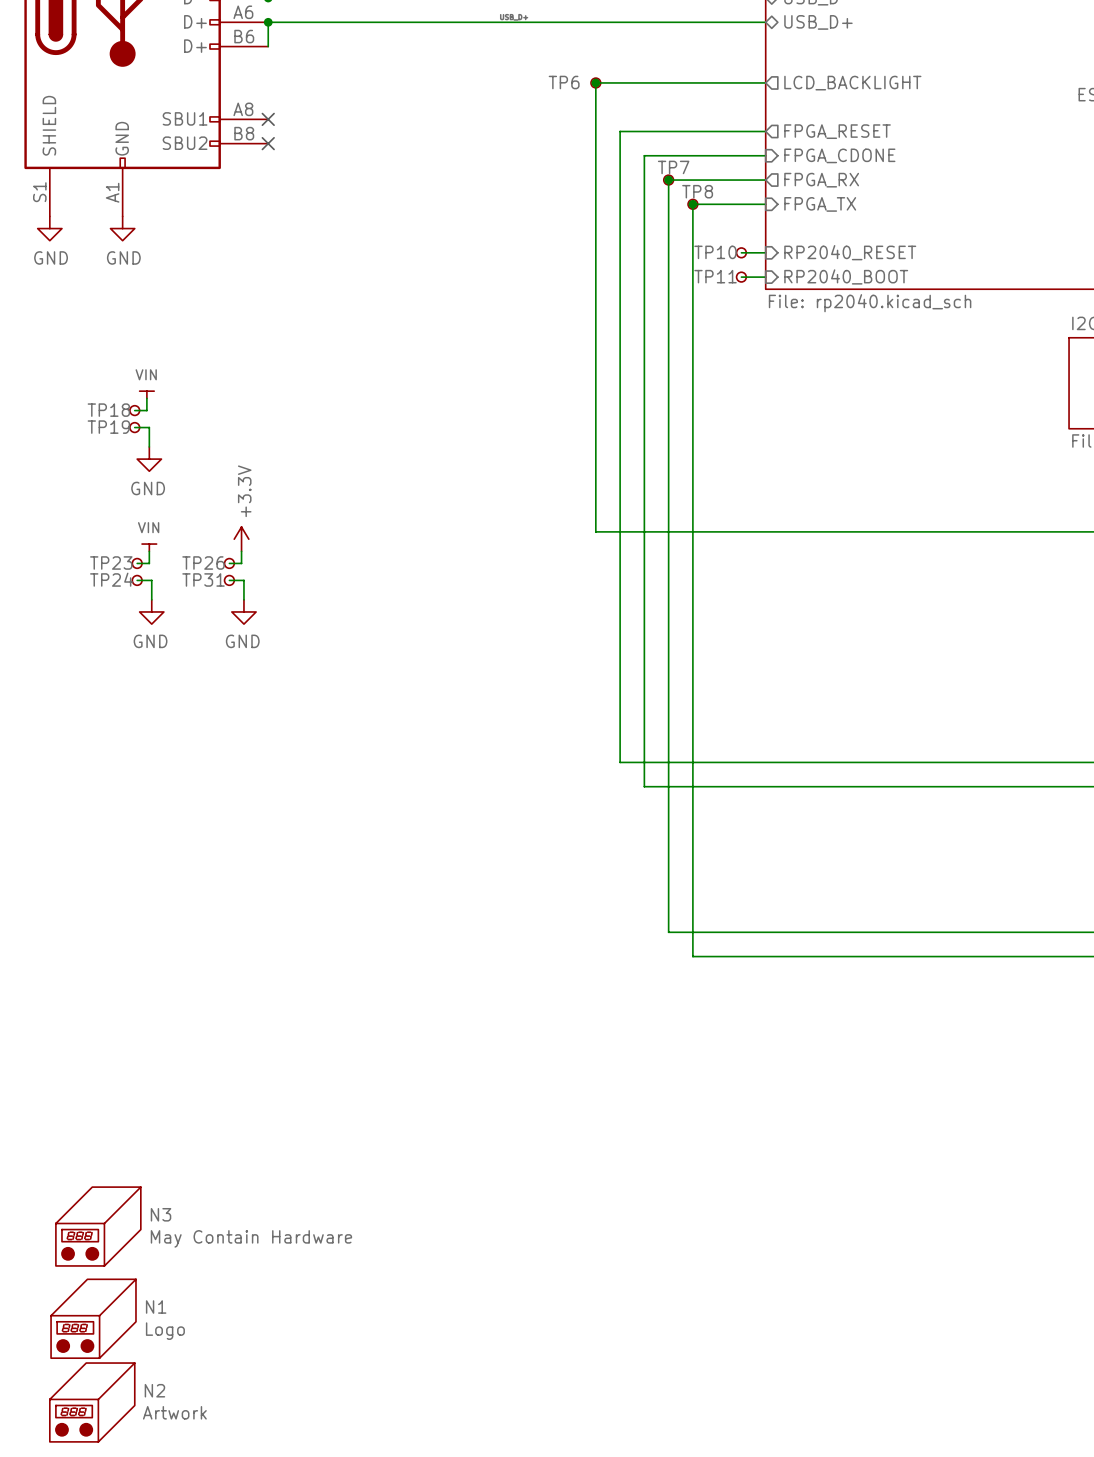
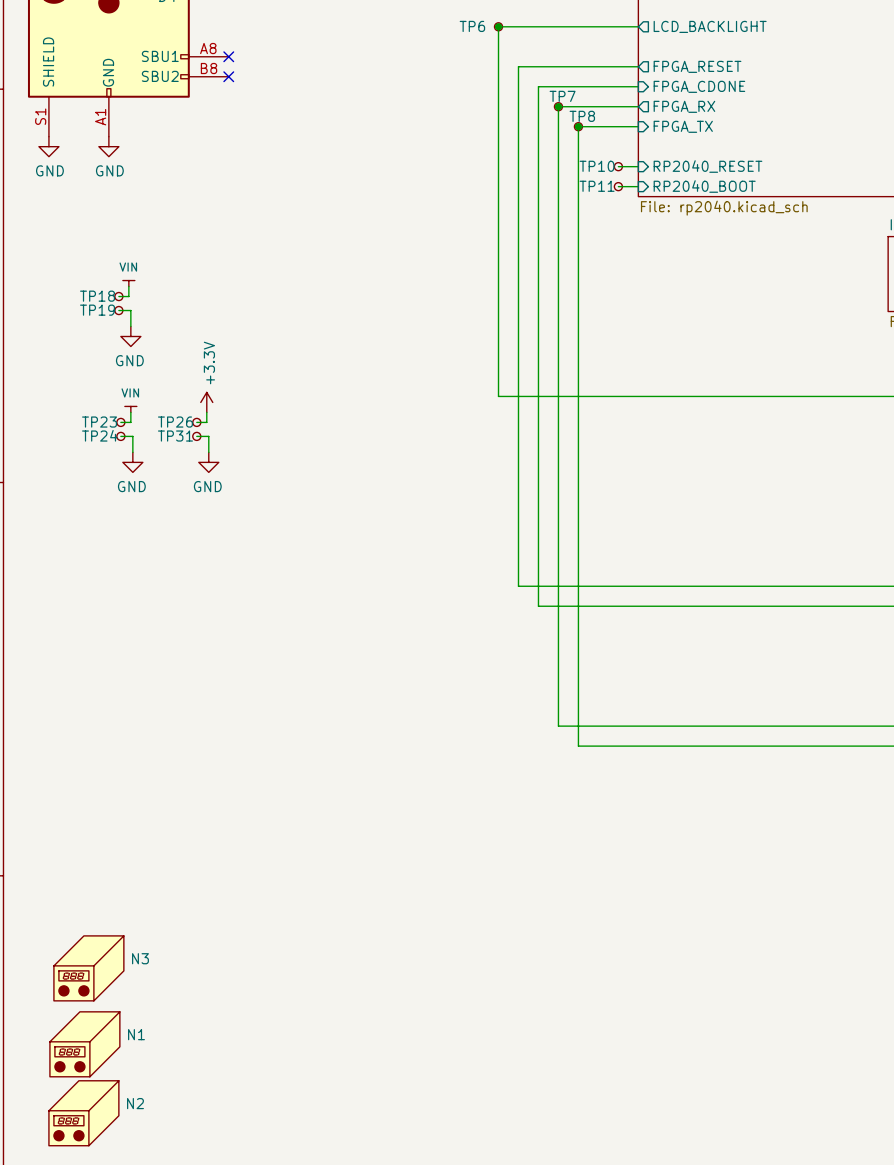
N3 value: May Contain Hardware (251, 1238) -> none
N1 value: Logo (165, 1331) -> none
N2 value: Artwork (174, 1412) -> none

